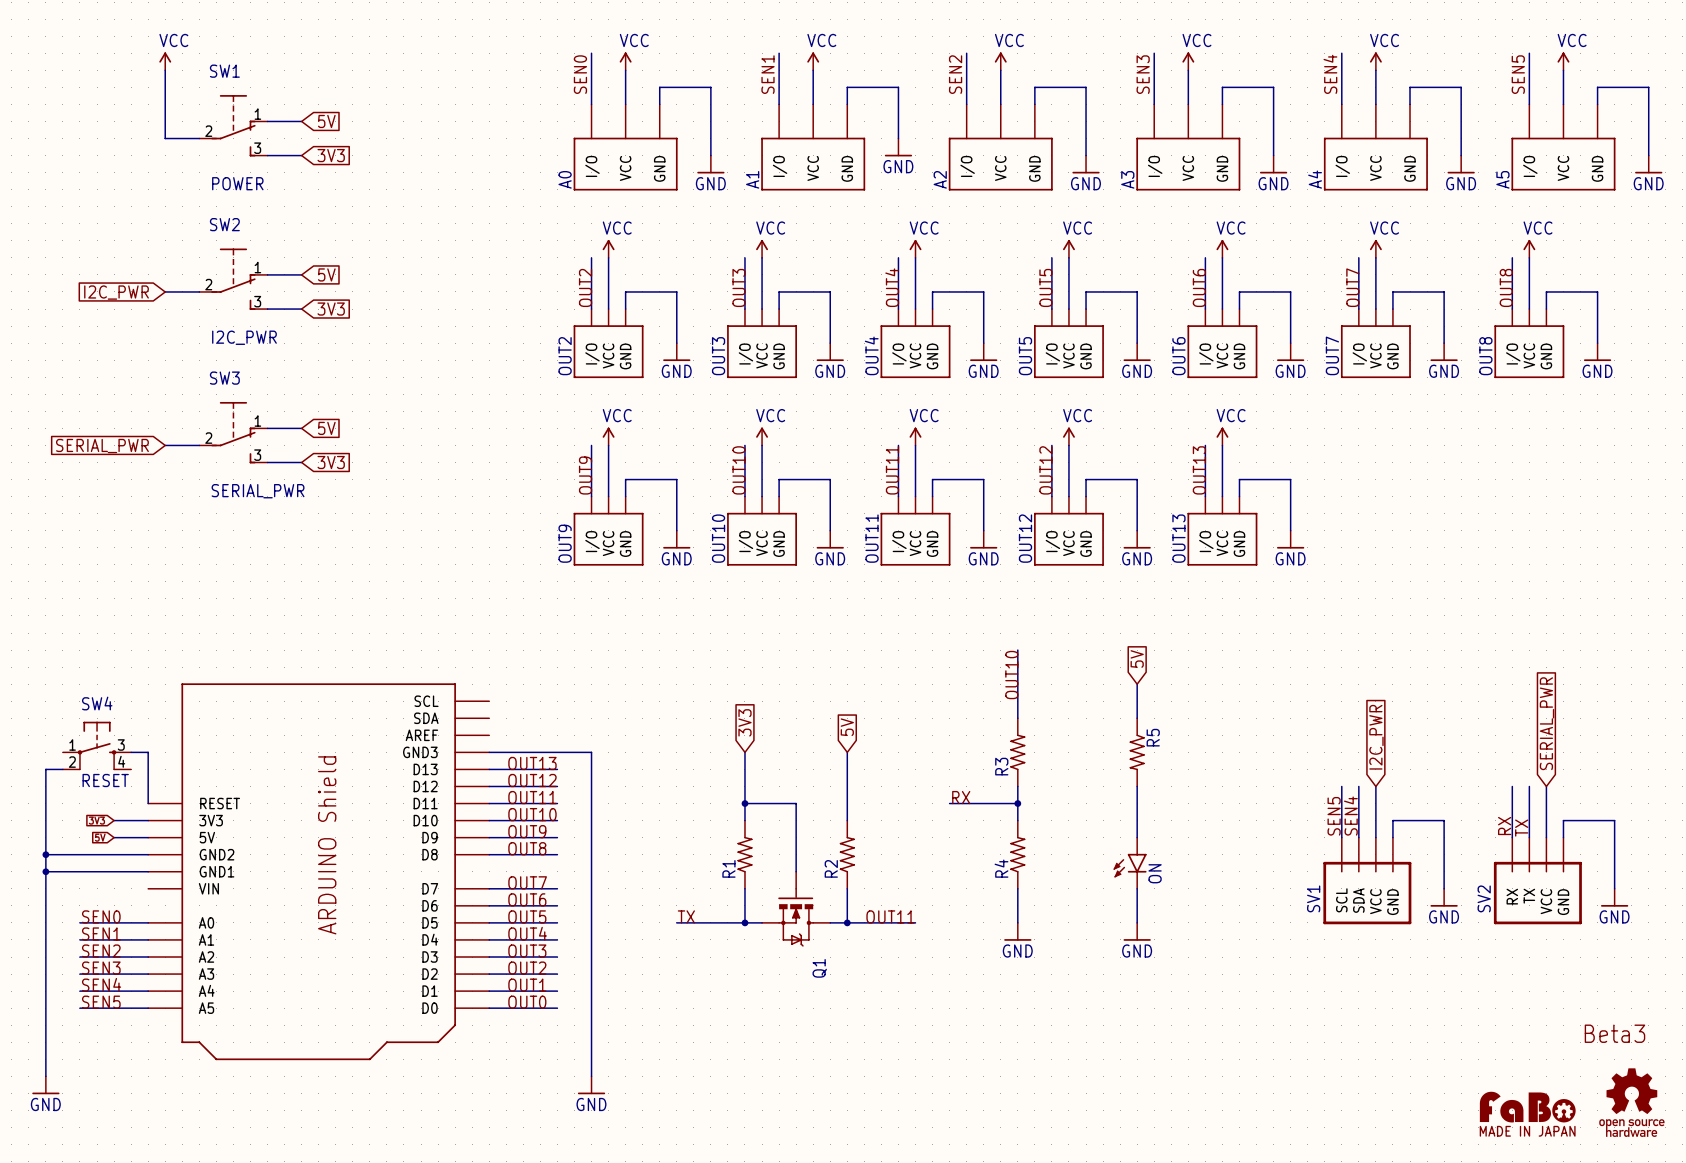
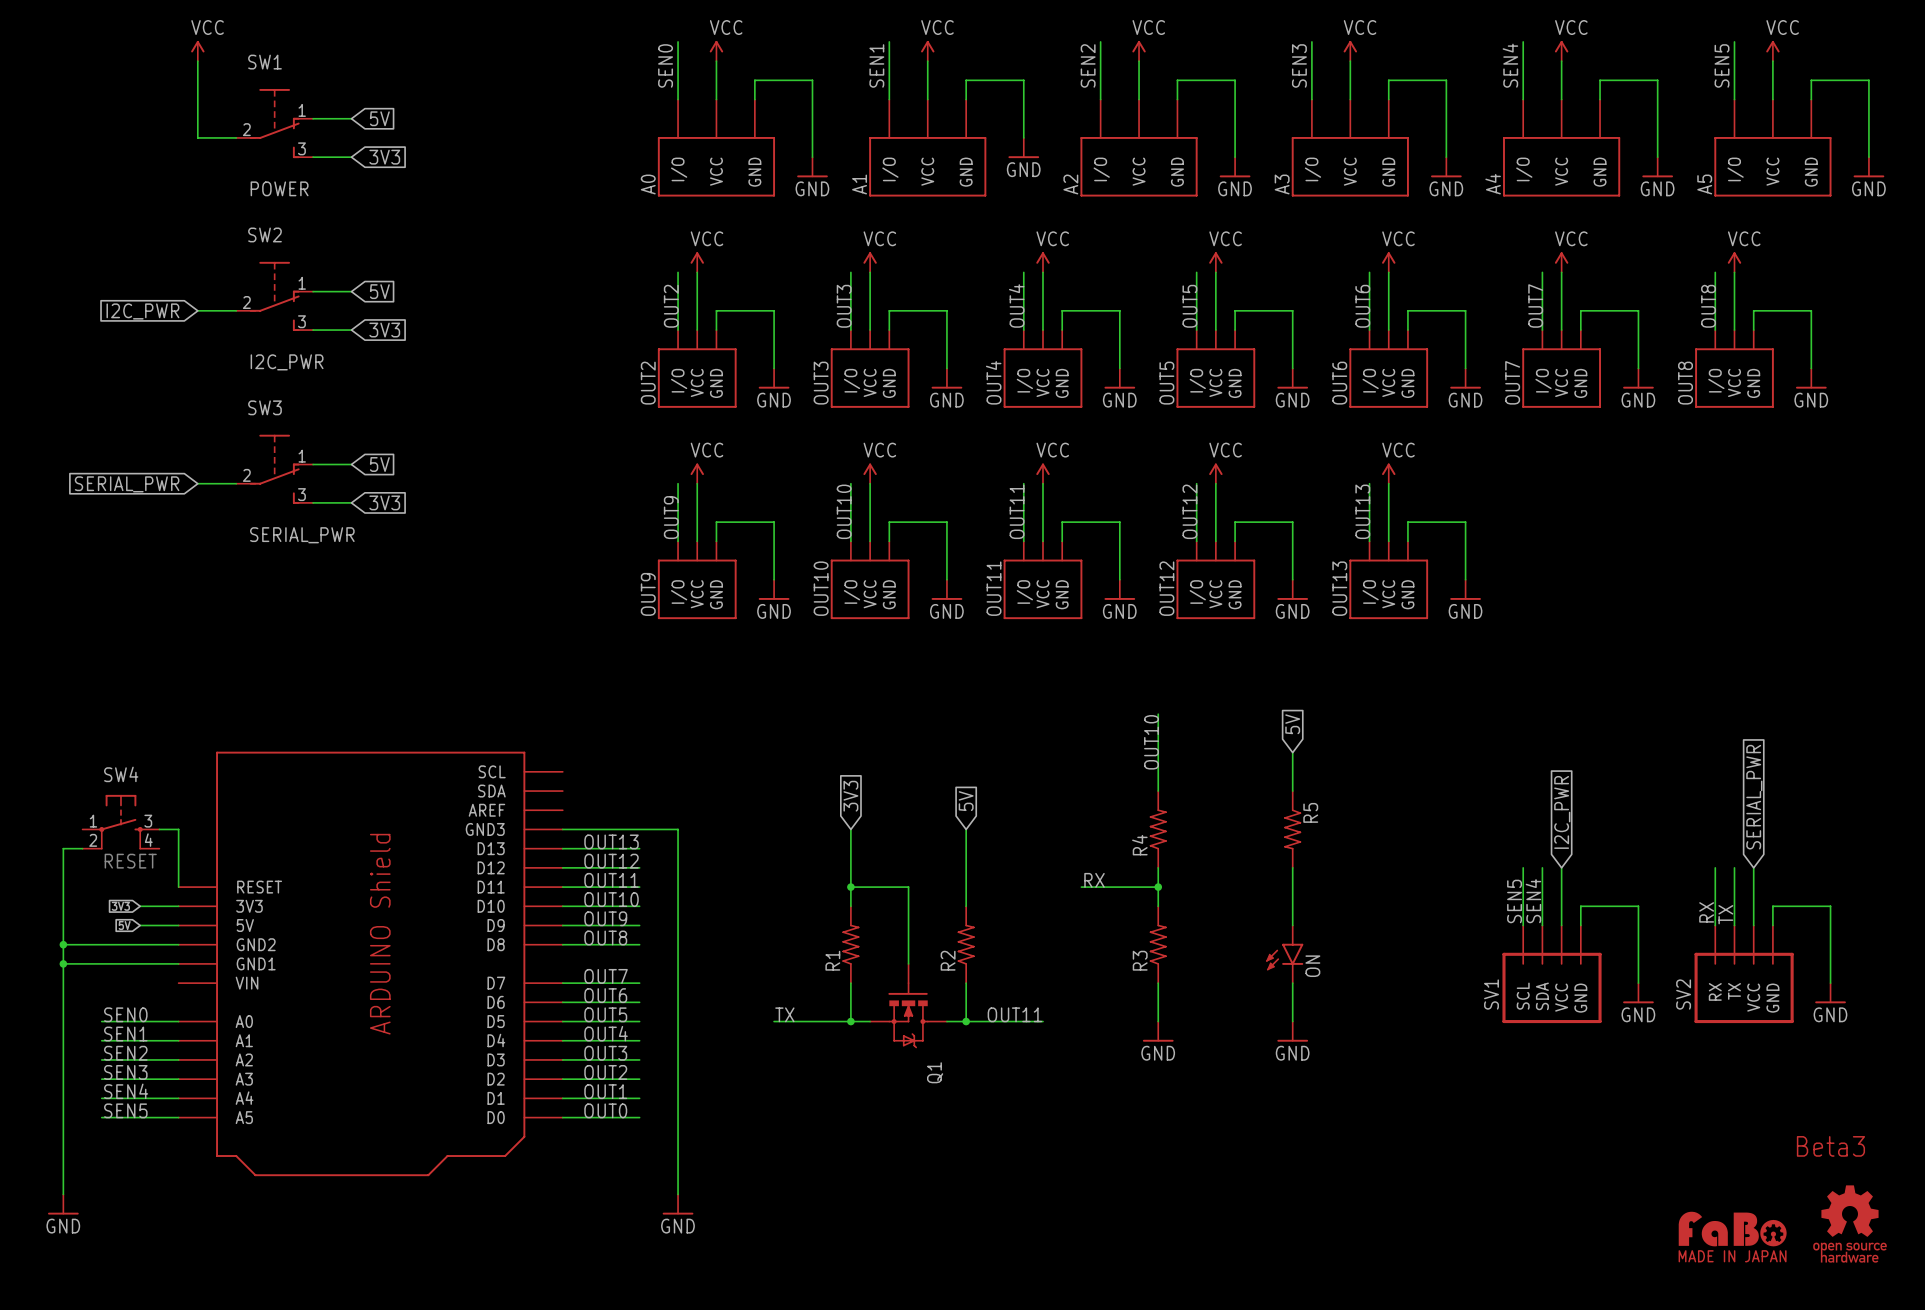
R3 name: R3 (1001, 766) -> R4 (1139, 845)
R4 name: R4 (1001, 868) -> R3 (1140, 960)

